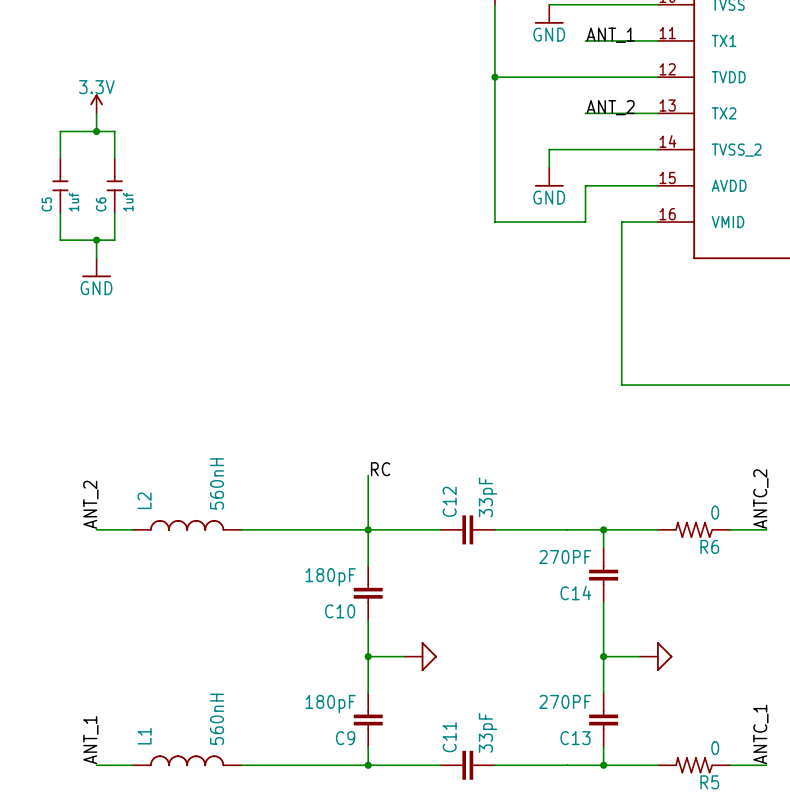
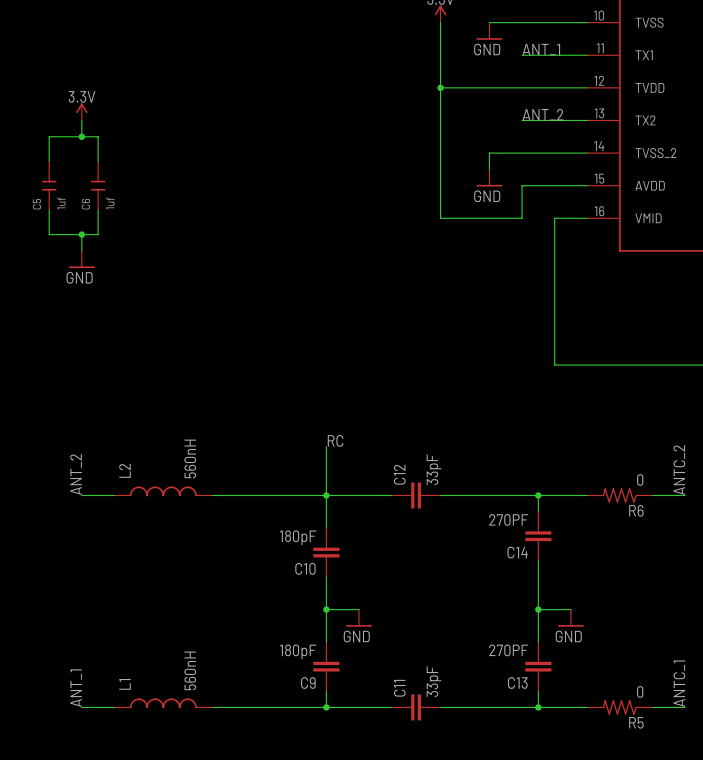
power symbol: (420, 656) -> none
power symbol: (656, 656) -> none
power symbol: none -> GND (359, 618)
power symbol: none -> GND (570, 618)

